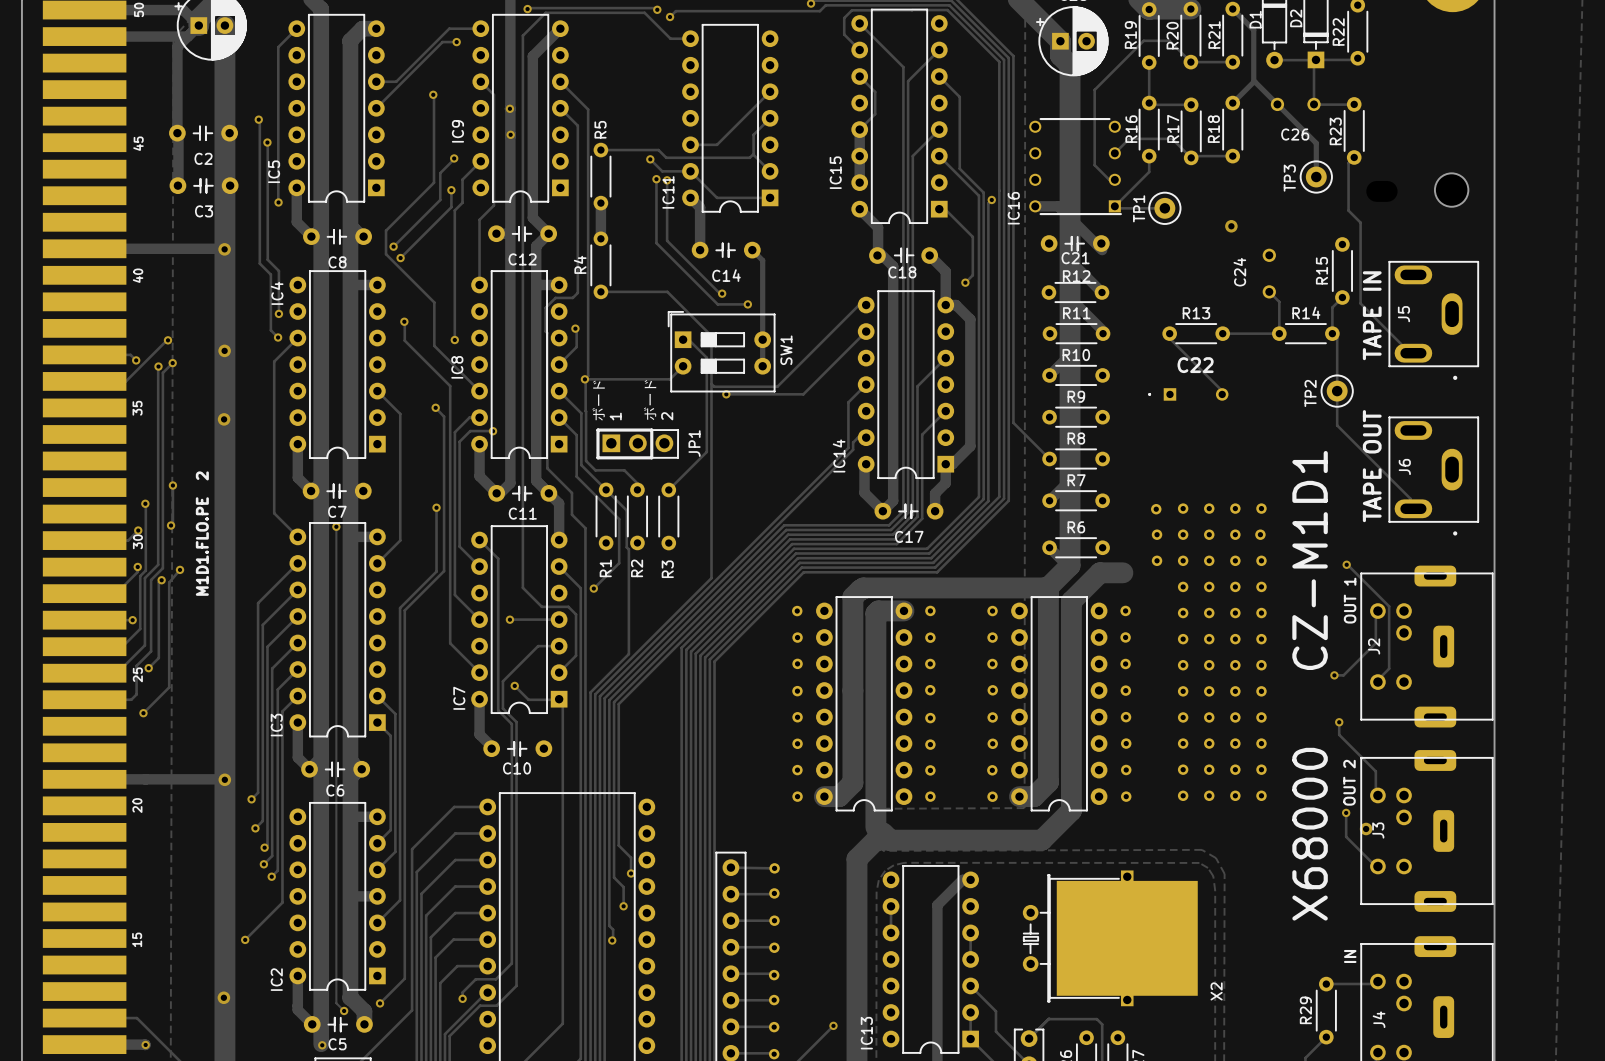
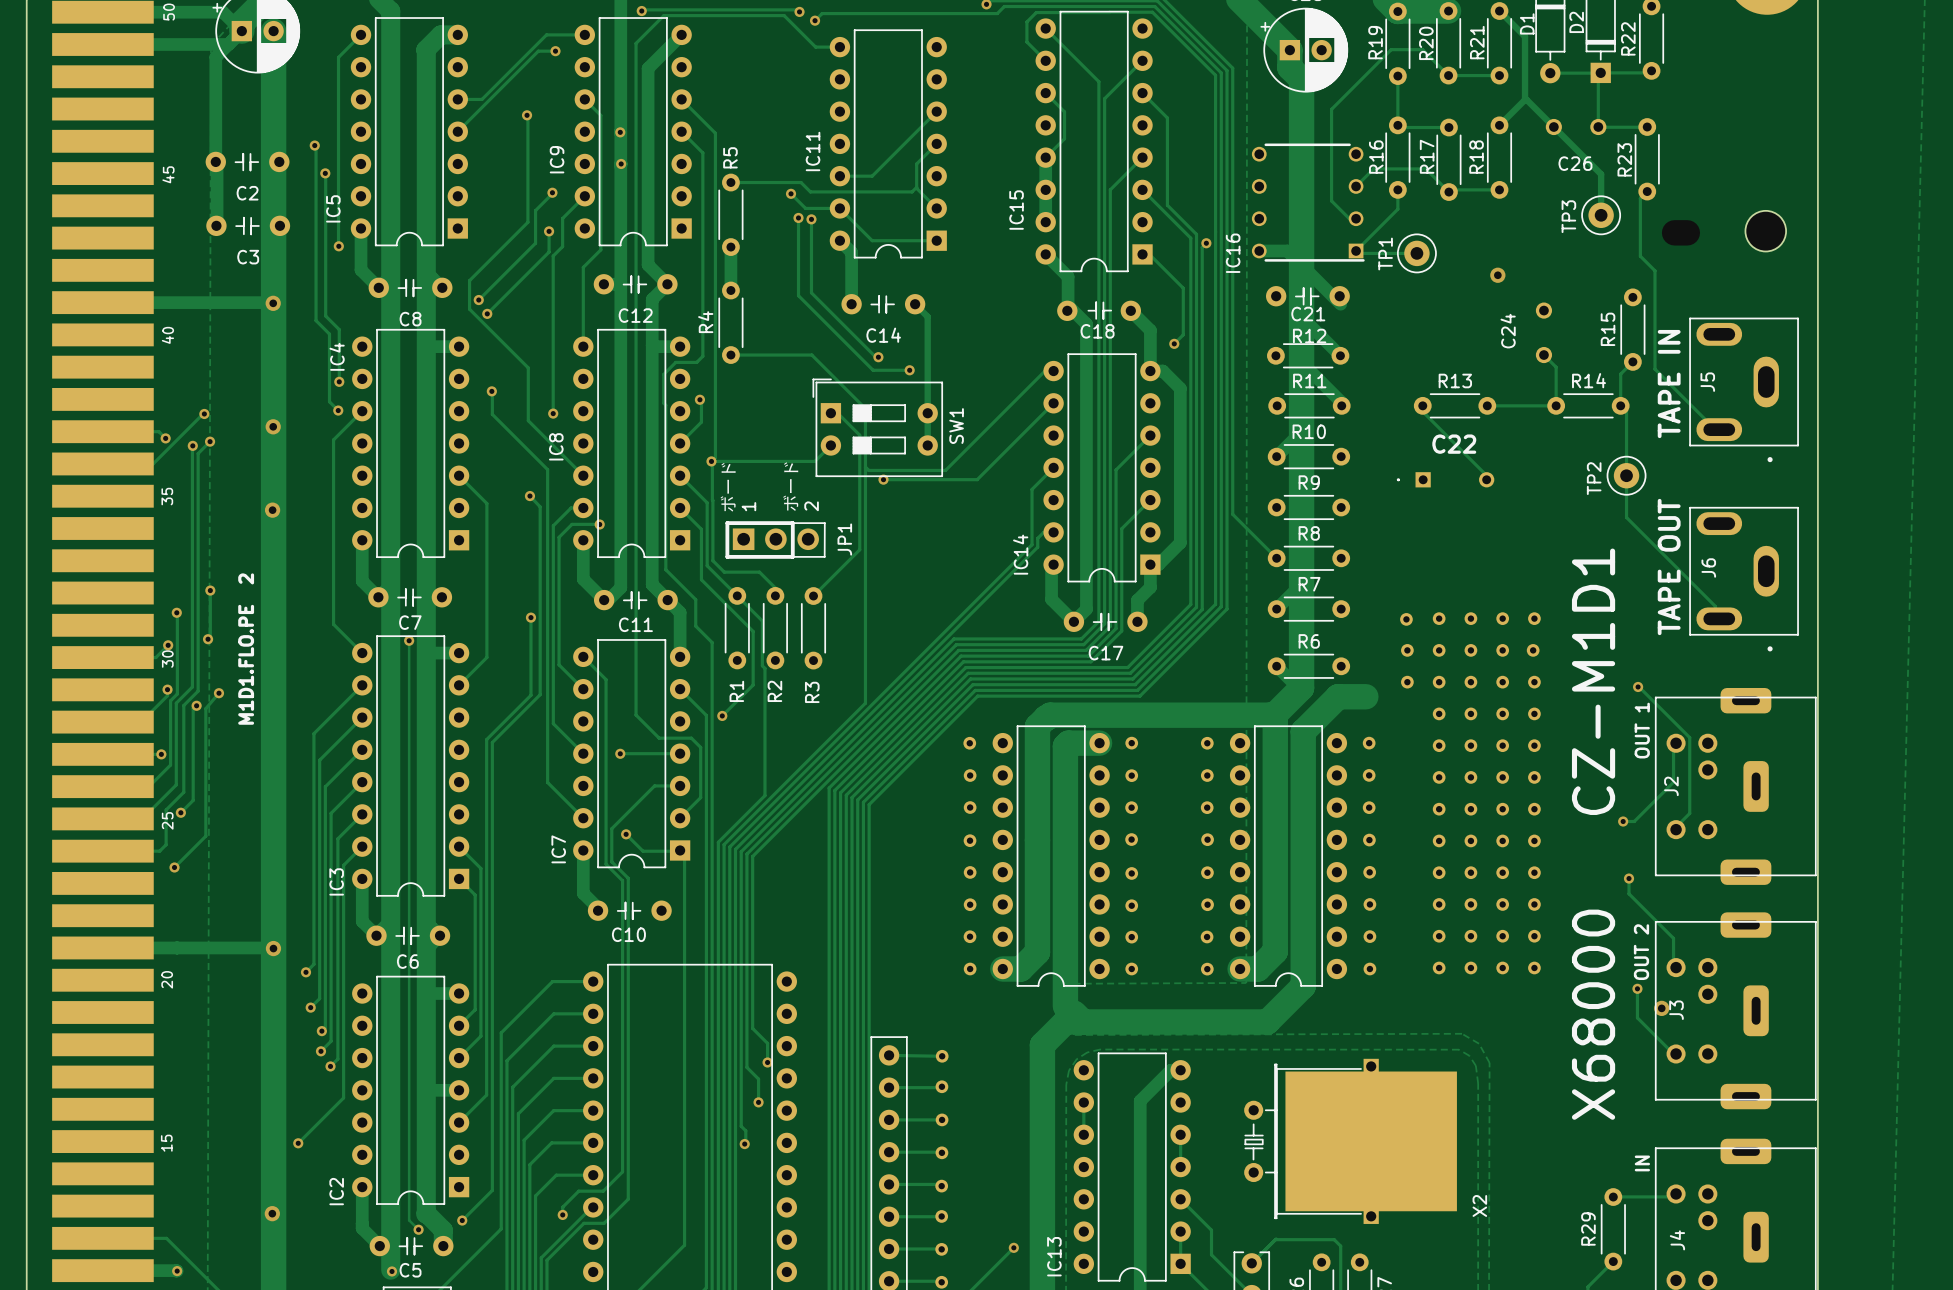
IC11 name position: IC11 (668, 192) -> IC11 (813, 151)

